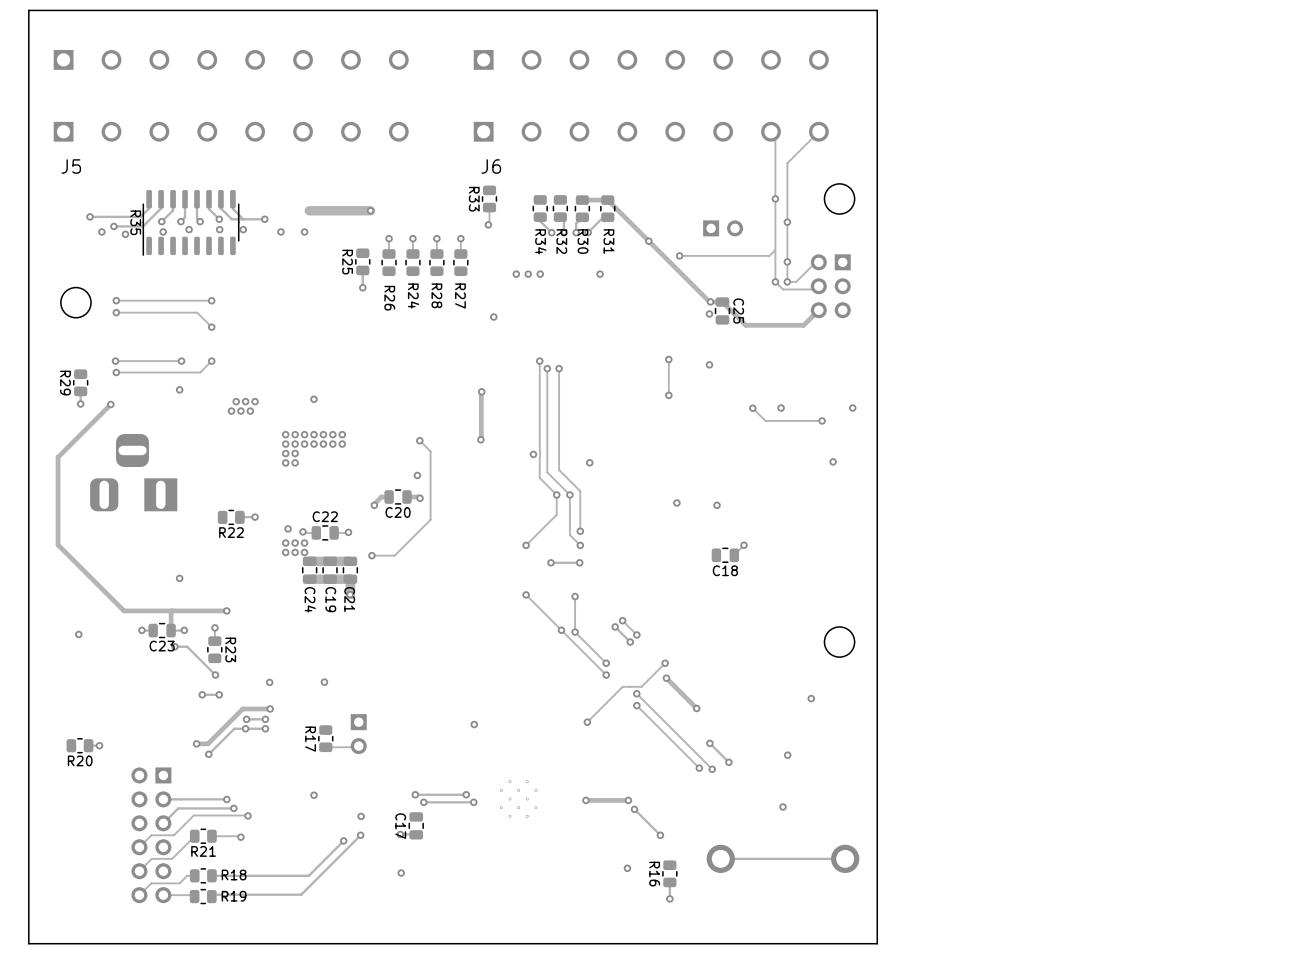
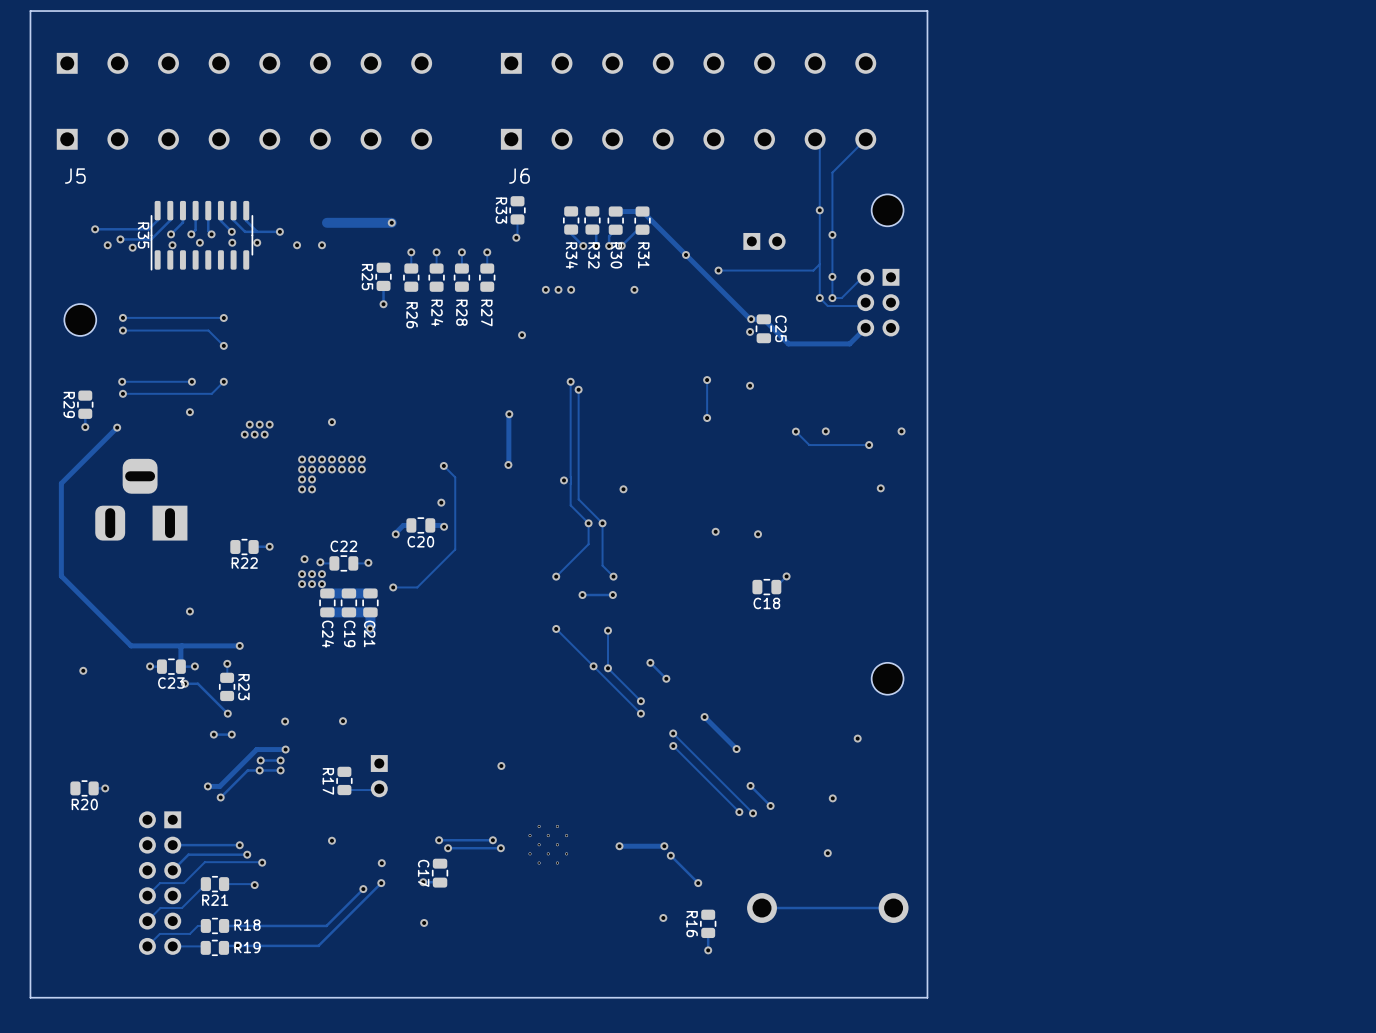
track: (559, 368) (559, 469) (580, 491) (580, 531) -> none
via: (559, 368) -> none
via: (580, 531) -> none
track: (622, 620) (636, 634) -> none
via: (622, 620) -> none
via: (636, 634) -> none
track: (665, 663) (641, 686) (622, 686) (587, 722) -> none
via: (665, 663) -> none
via: (587, 722) -> none

